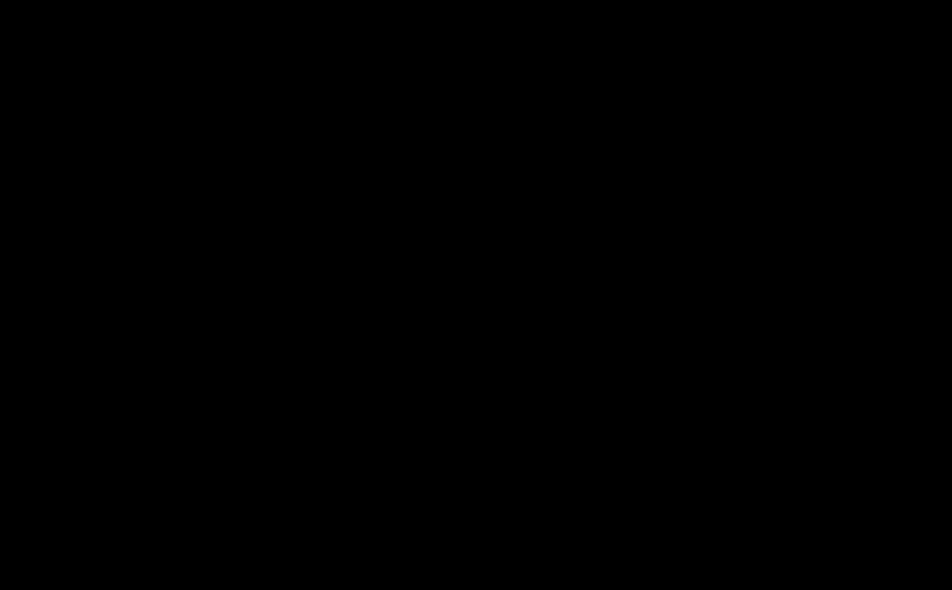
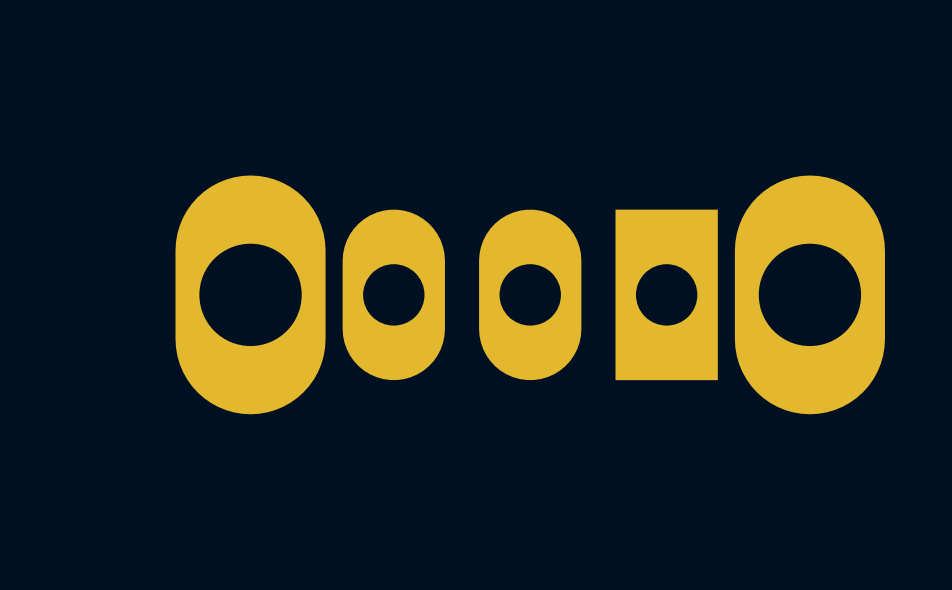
part: none -> (530, 294)

